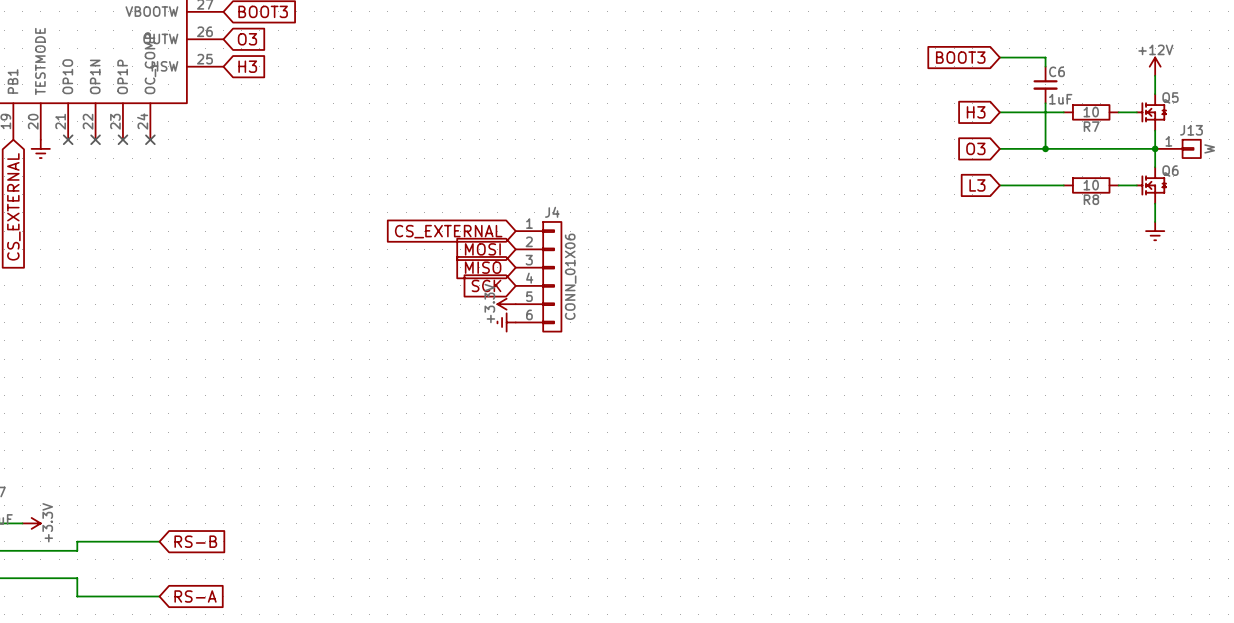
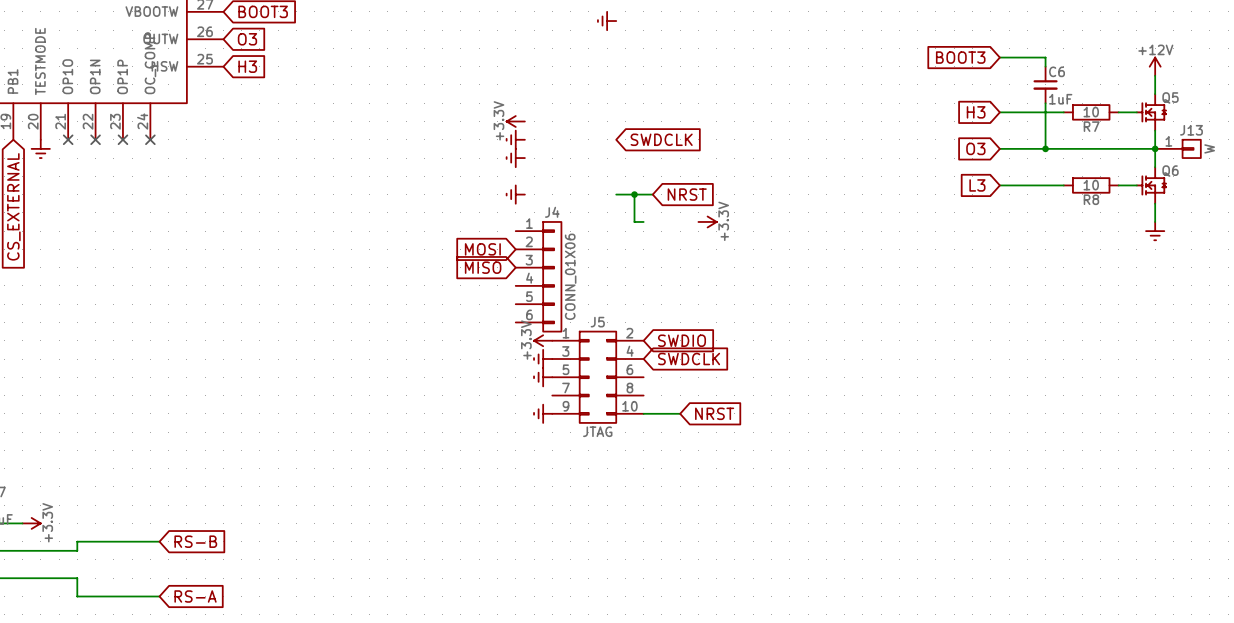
power symbol: none -> (607, 21)
power symbol: none -> +3.3V (515, 121)
power symbol: none -> (515, 139)
global label: none -> SWDCLK (661, 139)
power symbol: none -> (515, 158)
power symbol: none -> (515, 194)
wire: none -> (616, 194) (652, 194)
wire: none -> (634, 194) (634, 221) (643, 221)
junction: none -> (634, 194)
global label: none -> NRST (687, 194)
power symbol: none -> +3.3V (707, 221)
global label: CS_EXTERNAL (448, 231) -> none
global label: SCK (486, 285) -> none
power symbol position: +3.3V (506, 304) -> +3.3V (543, 340)
power symbol: (506, 322) -> none
global label: none -> SWDIO (682, 340)
power symbol: none -> (543, 359)
global label: none -> SWDCLK (689, 359)
power symbol: none -> (543, 377)
J5: none -> JTAG (597, 377)
power symbol: none -> (543, 413)
wire: none -> (643, 413) (680, 413)
global label: none -> NRST (714, 413)

